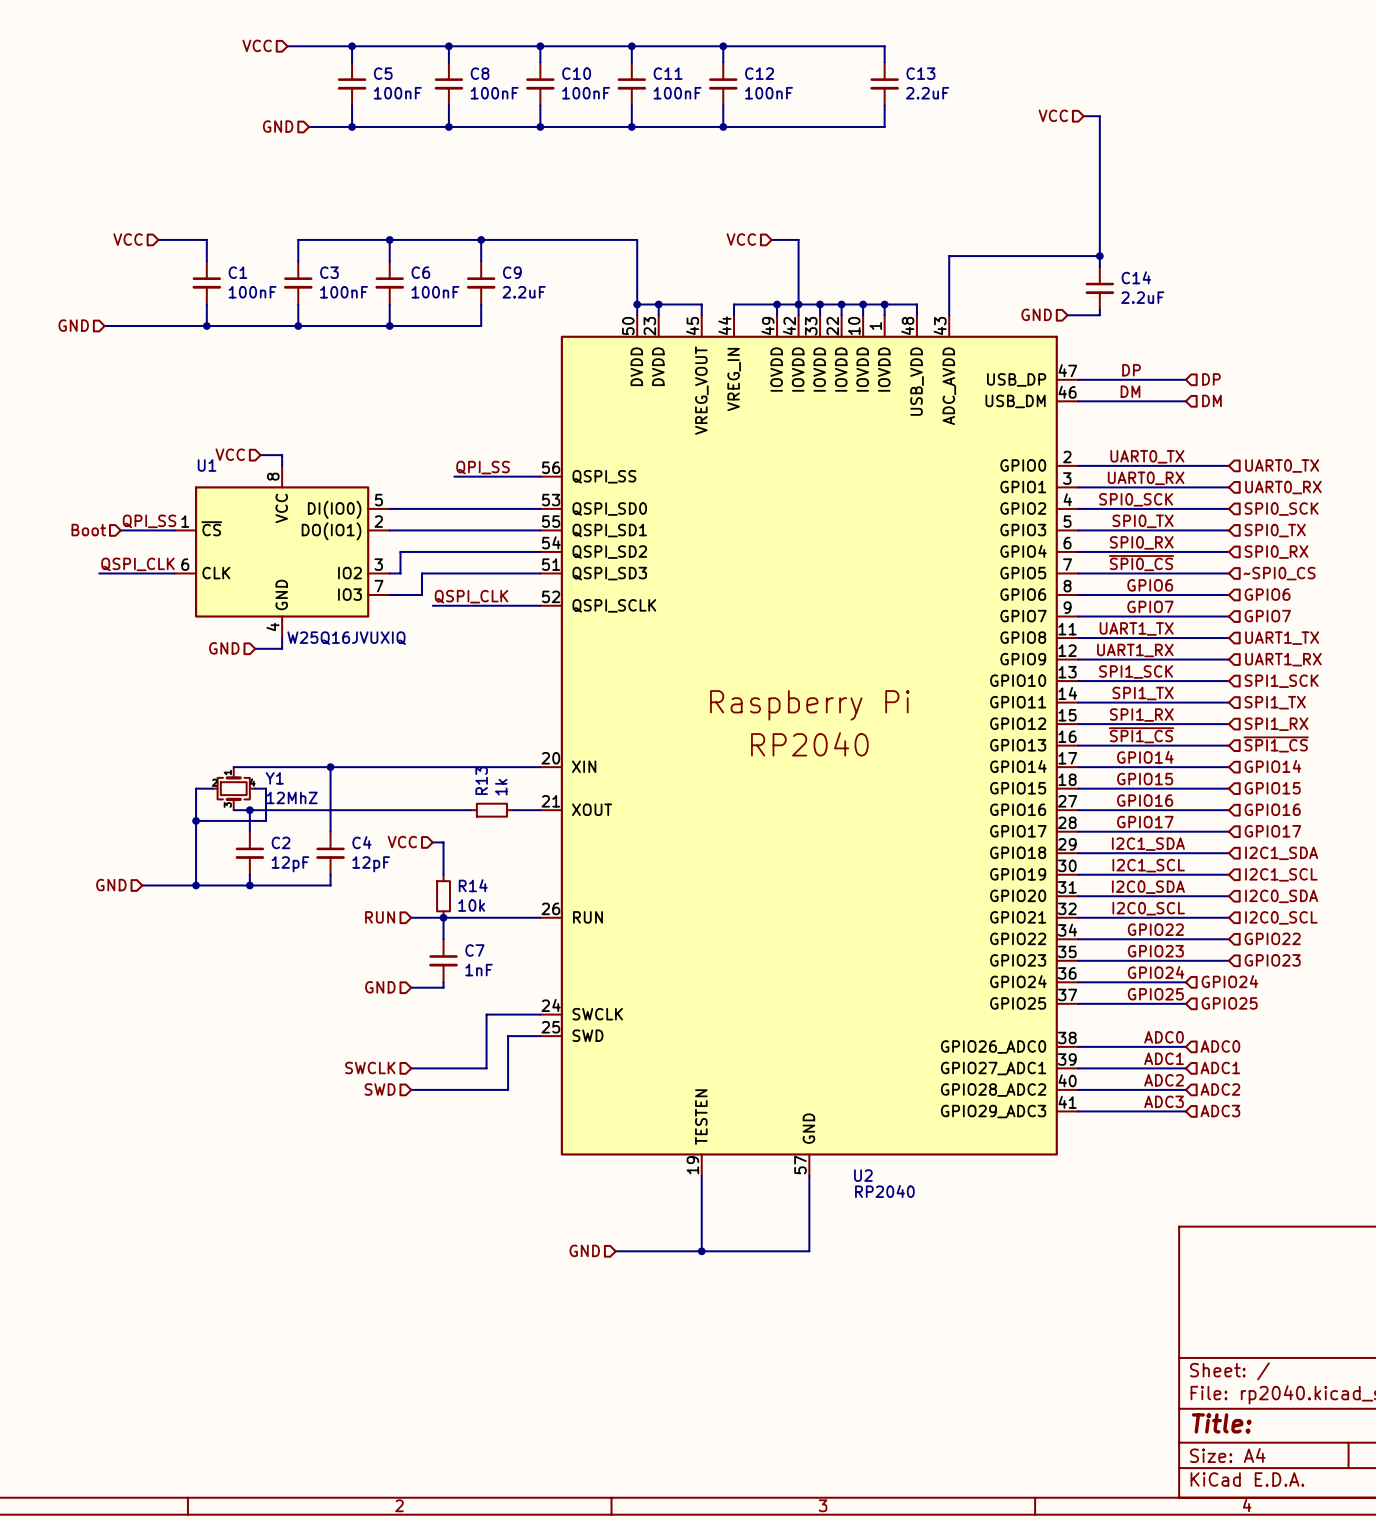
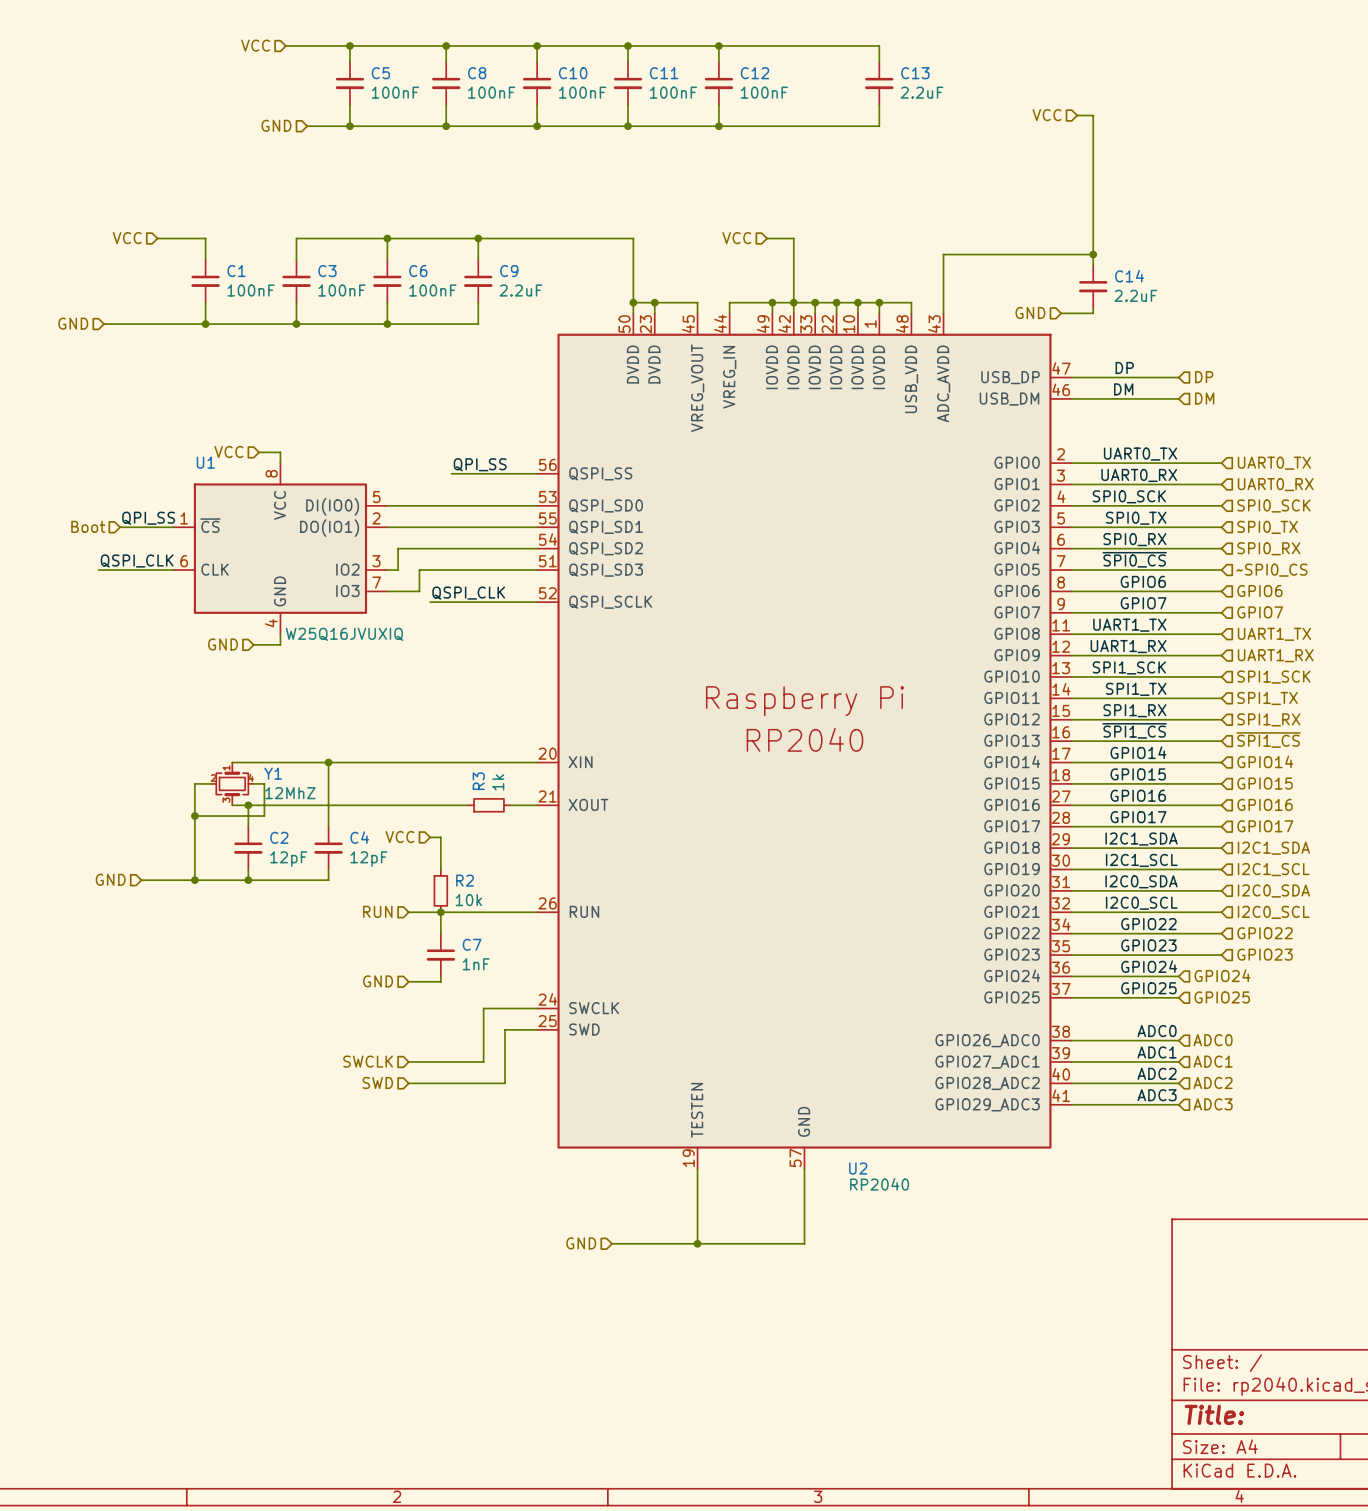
R13 name: R13 (481, 780) -> R3 (478, 781)
R14 name: R14 (473, 885) -> R2 (465, 880)

